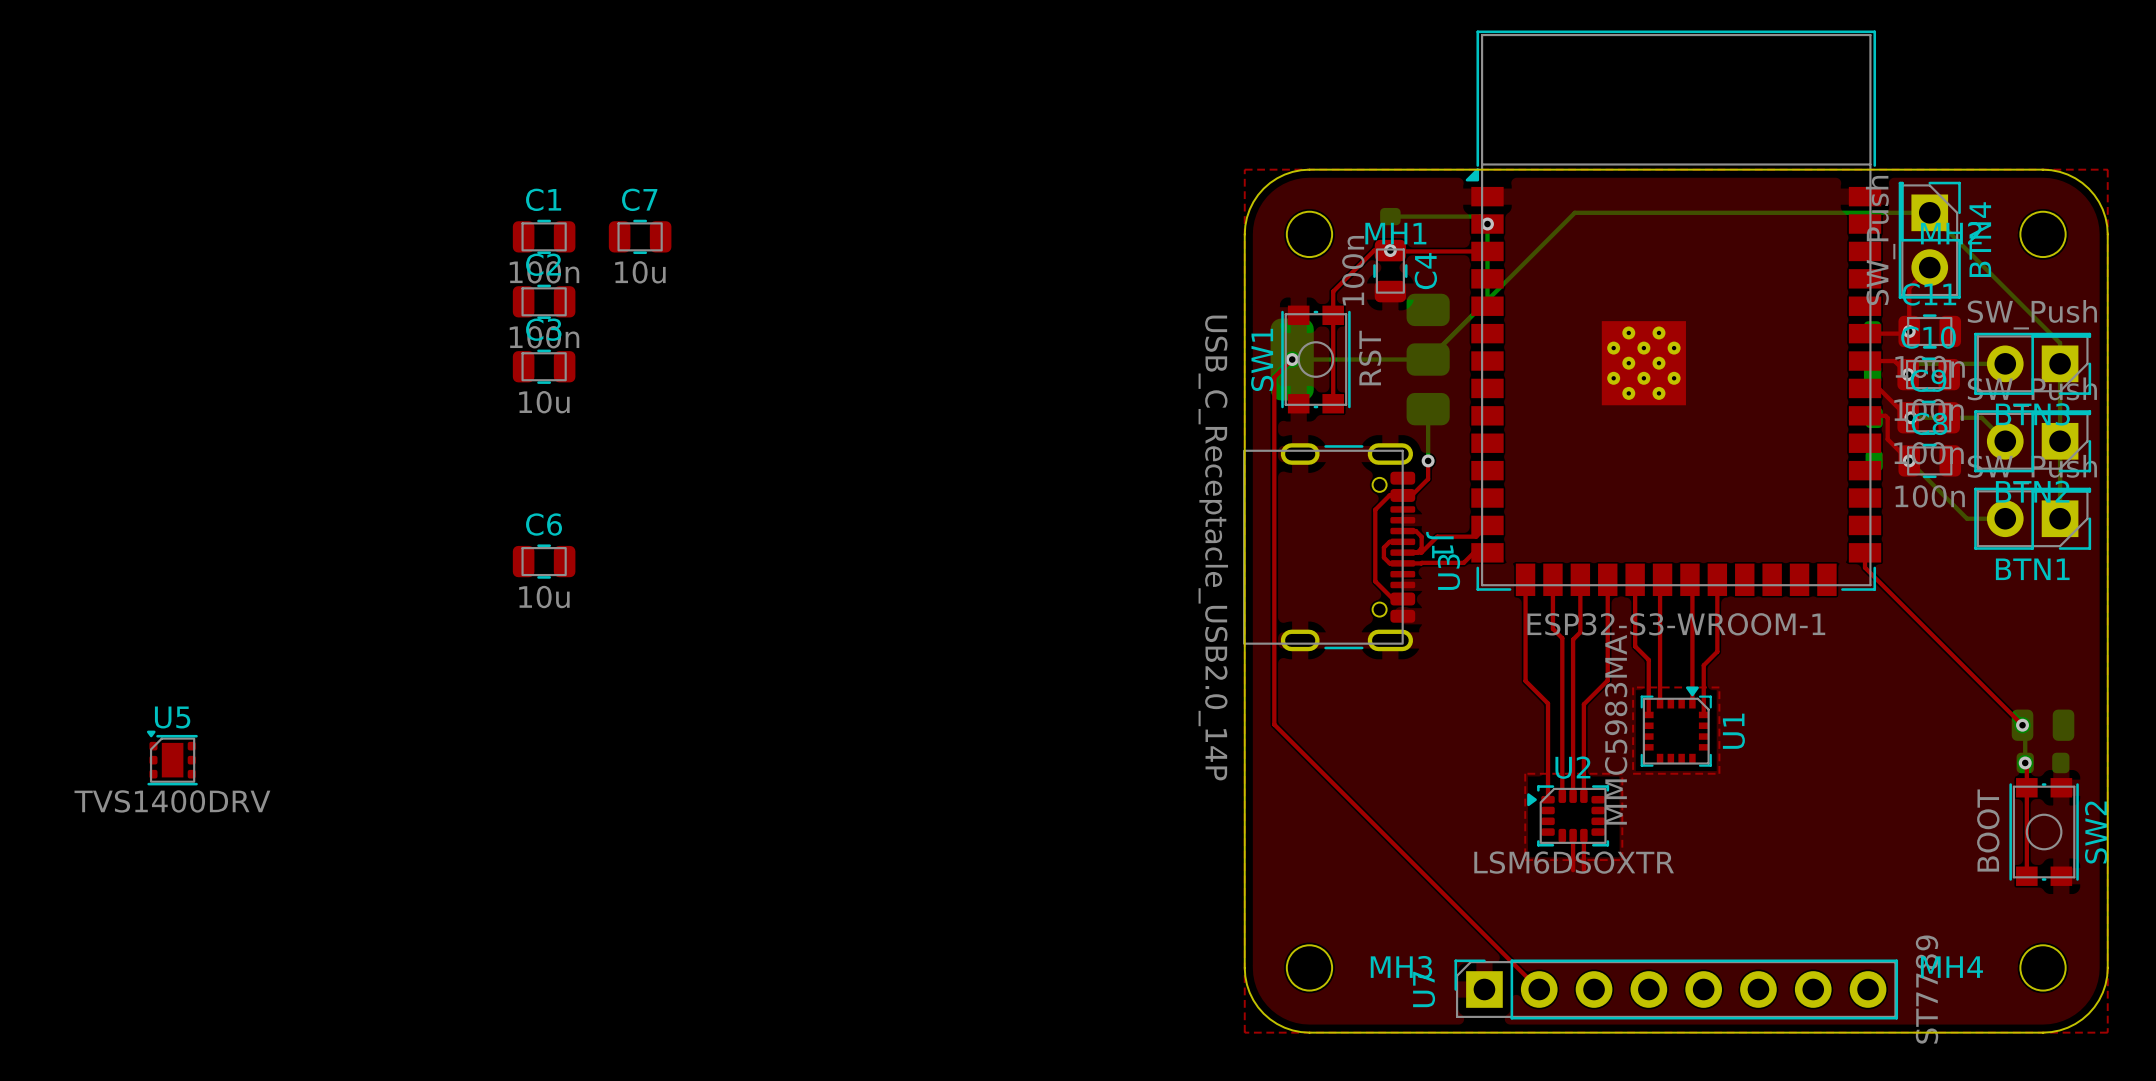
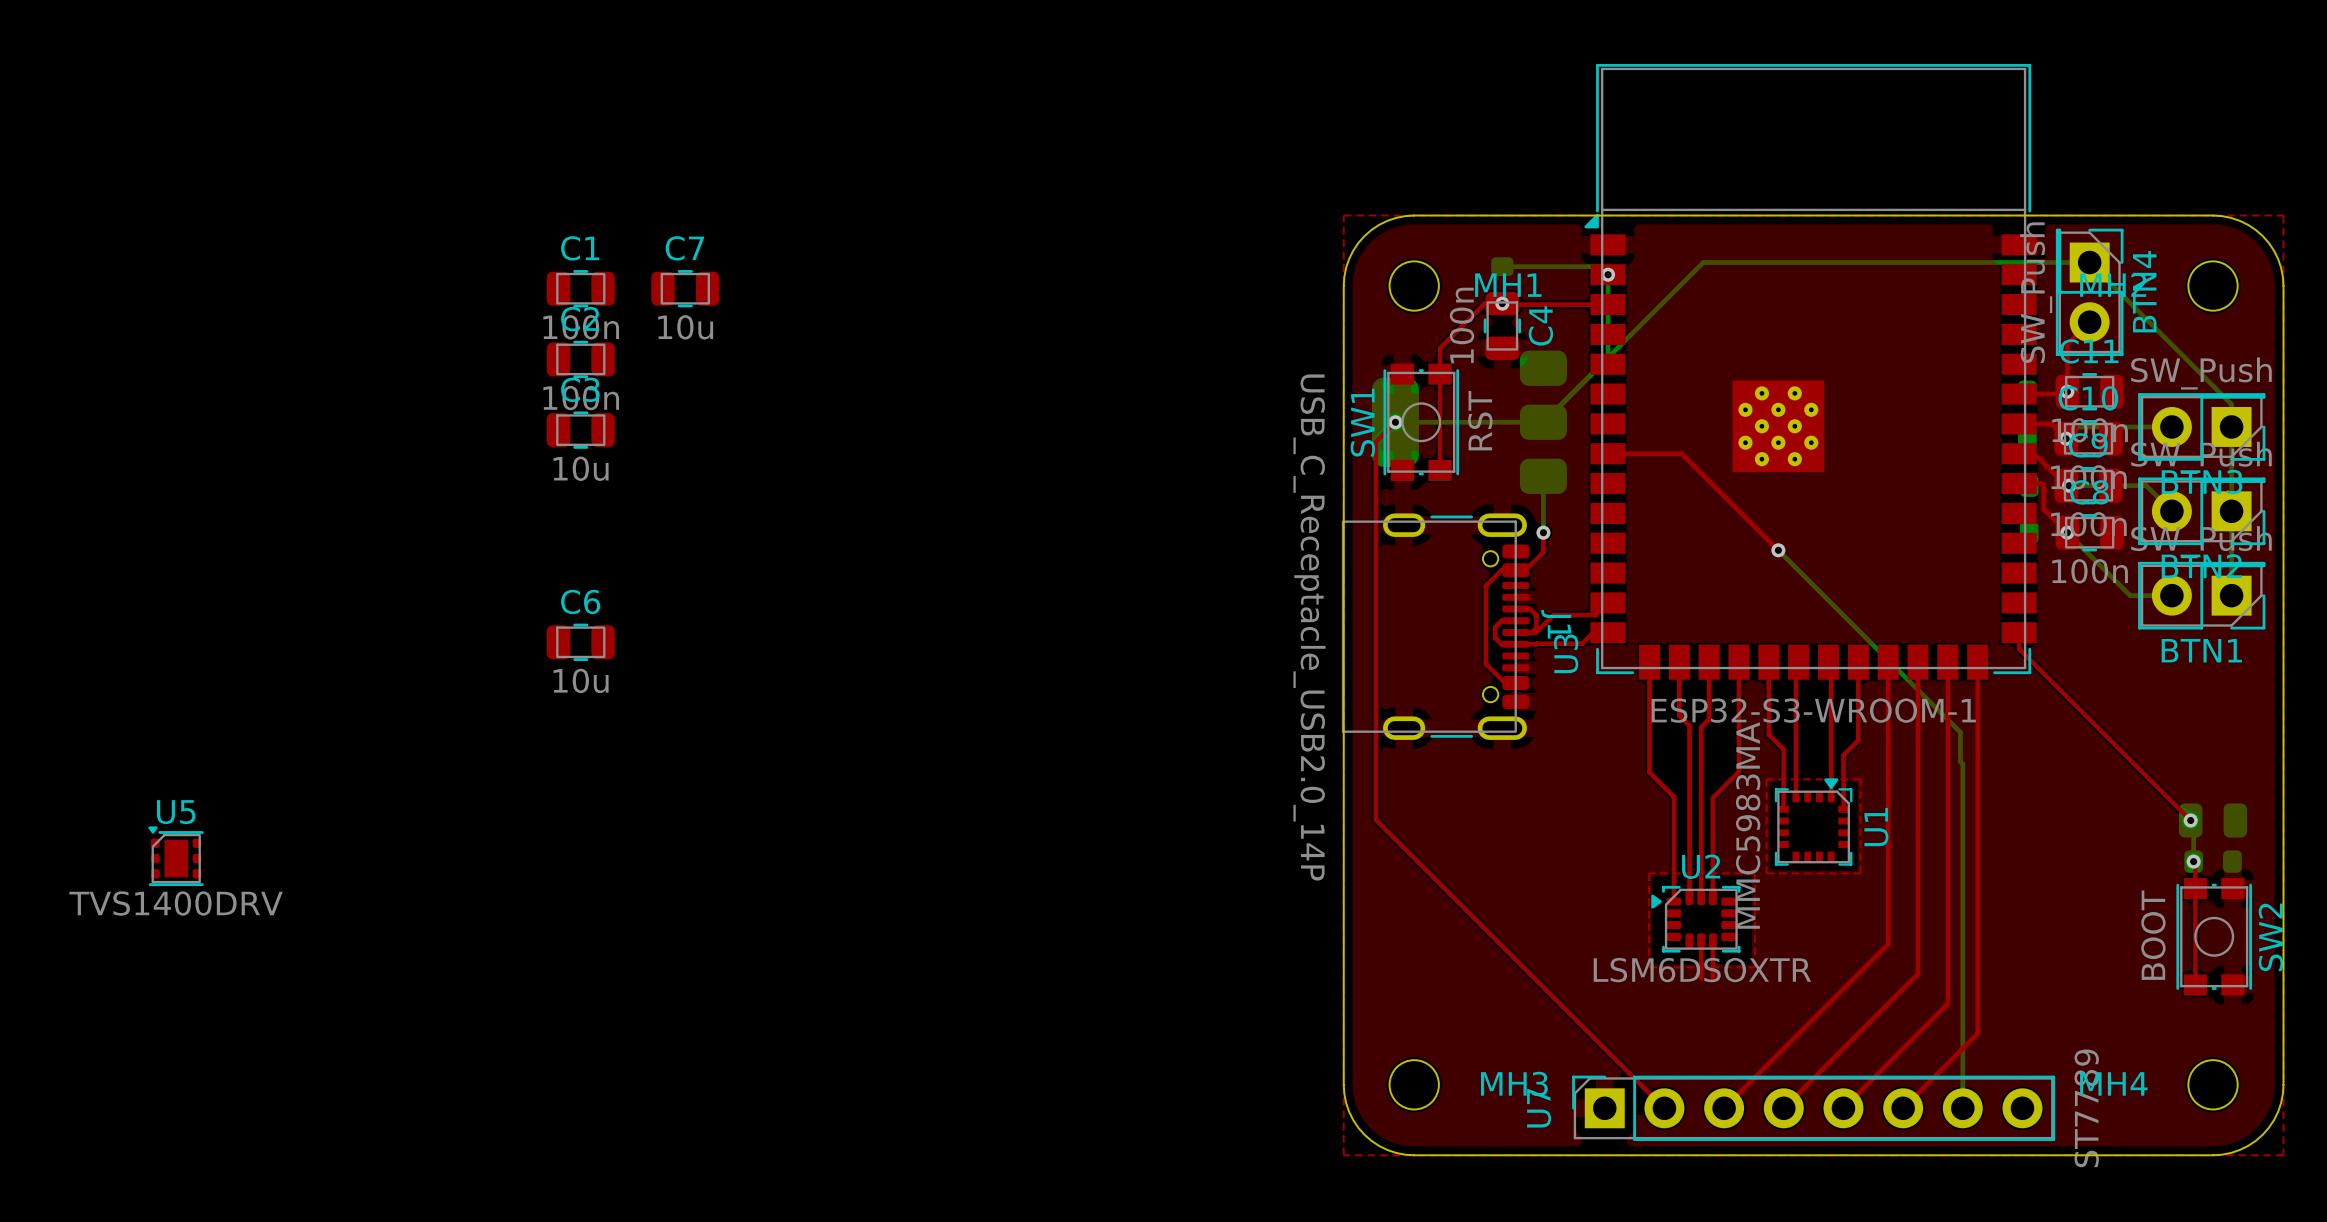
top track: none -> (1608, 453) (1681, 453) (1778, 550)
bottom track: none -> (1778, 550) (1960, 732) (1960, 761) (1962, 764) (1962, 1108)
via: none -> (1778, 550)
top track: none -> (1888, 662) (1888, 944) (1724, 1108)
top track: none -> (1918, 662) (1918, 974) (1783, 1108)
top track: none -> (1947, 662) (1947, 1003) (1843, 1108)
top track: none -> (1977, 662) (1977, 1033) (1903, 1108)

